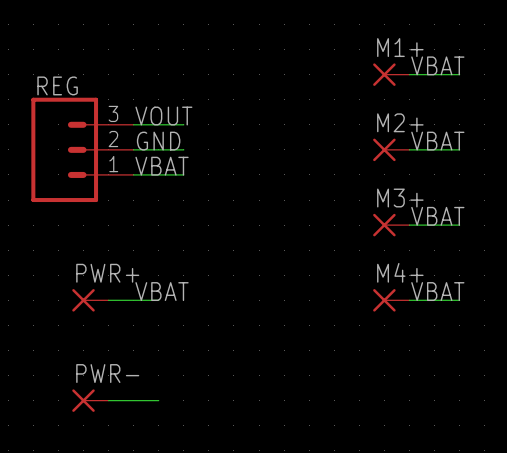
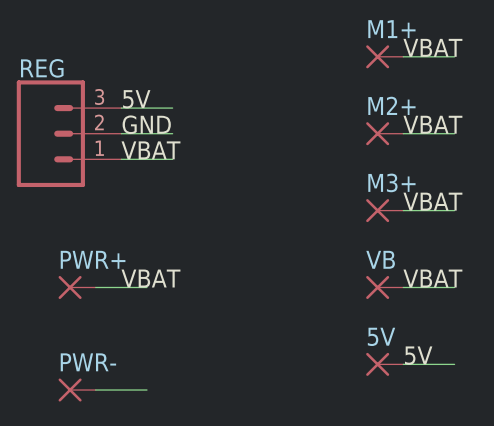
label: VOUT (163, 116) -> 5V (136, 99)
M4+ name: M4+ (400, 272) -> VB (380, 259)
label: none -> 5V (418, 355)
5V: none -> (384, 364)
wire: none -> (403, 364) (454, 364)

